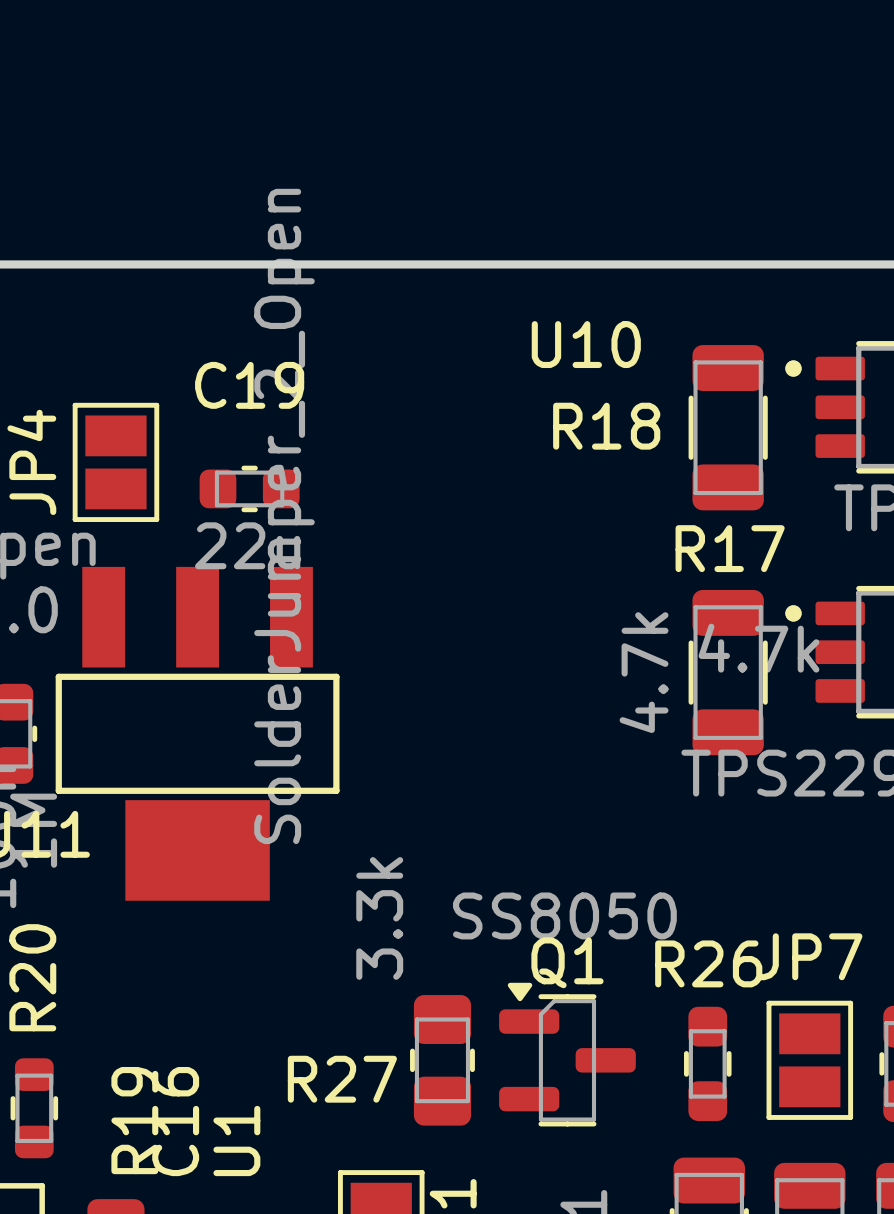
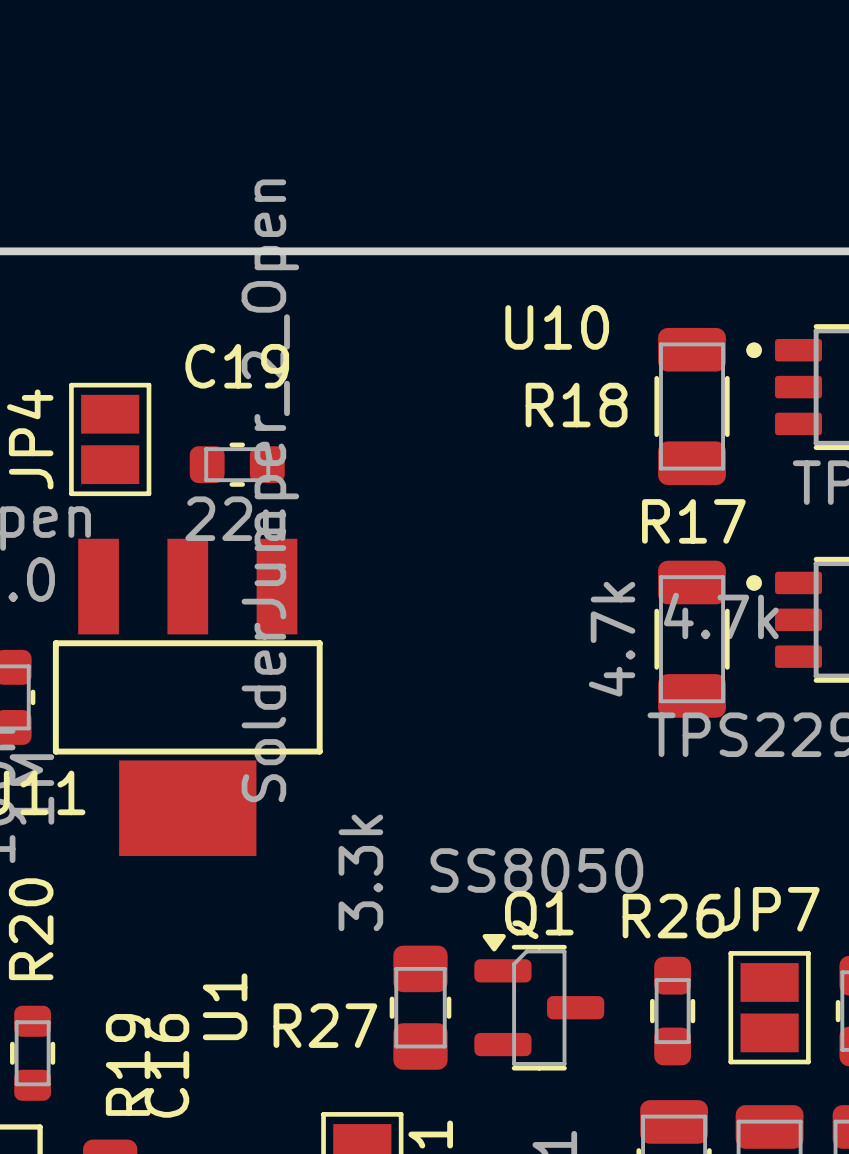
U1 name position: U1 (236, 1140) -> U1 (225, 1006)

